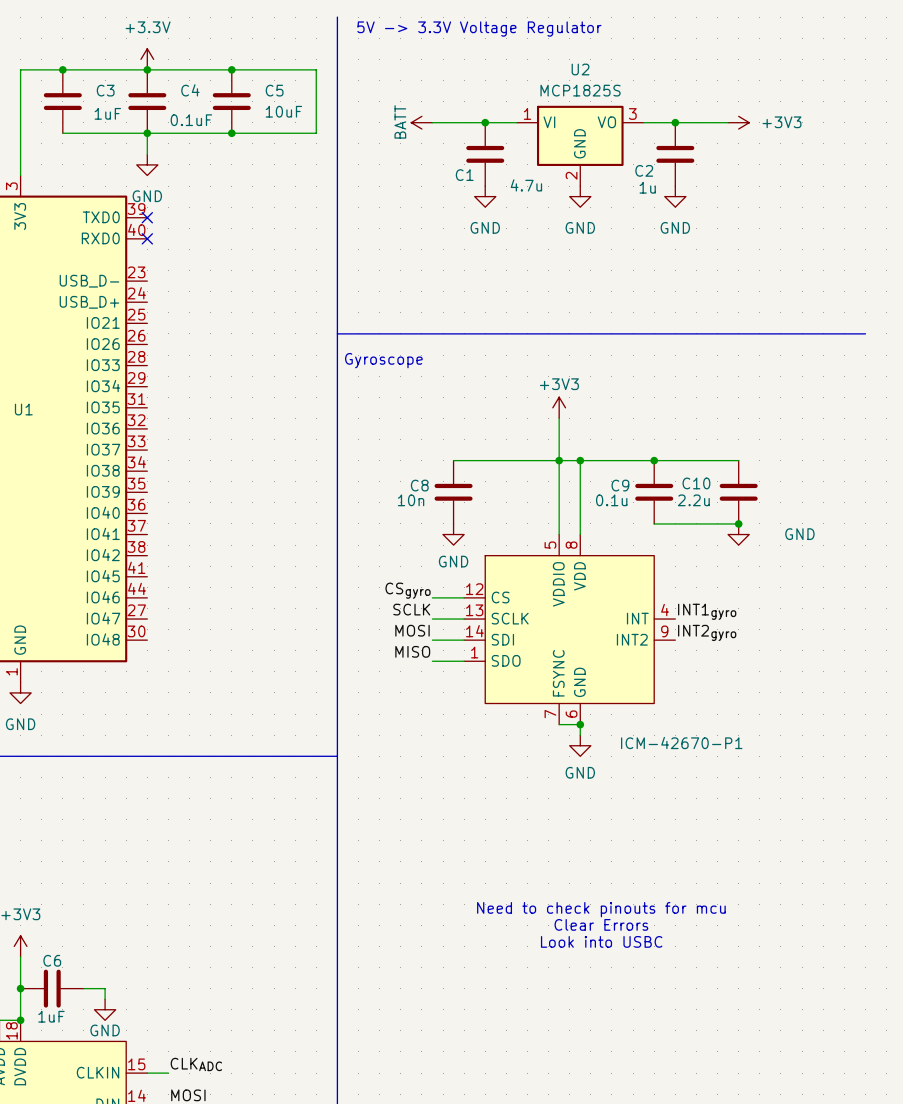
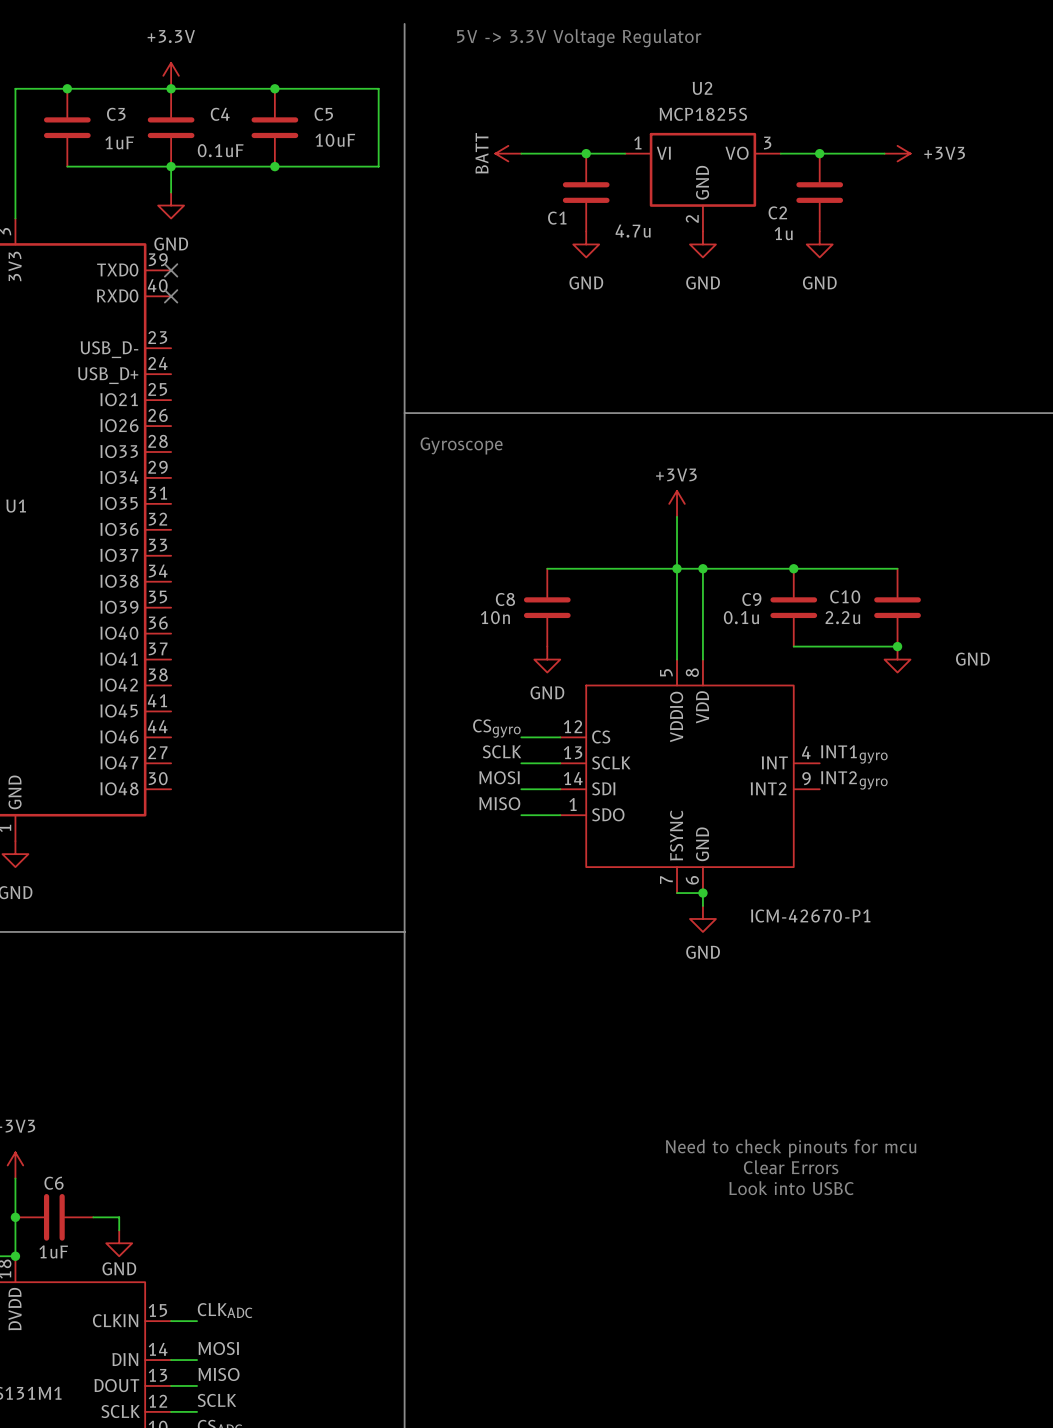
text position: Need to check pinouts for mcu (601, 909) -> Need to check pinouts for mcu (791, 1148)
text position: Clear Errors (601, 924) -> Clear Errors (791, 1167)
text position: Look into USBC (601, 941) -> Look into USBC (791, 1188)

